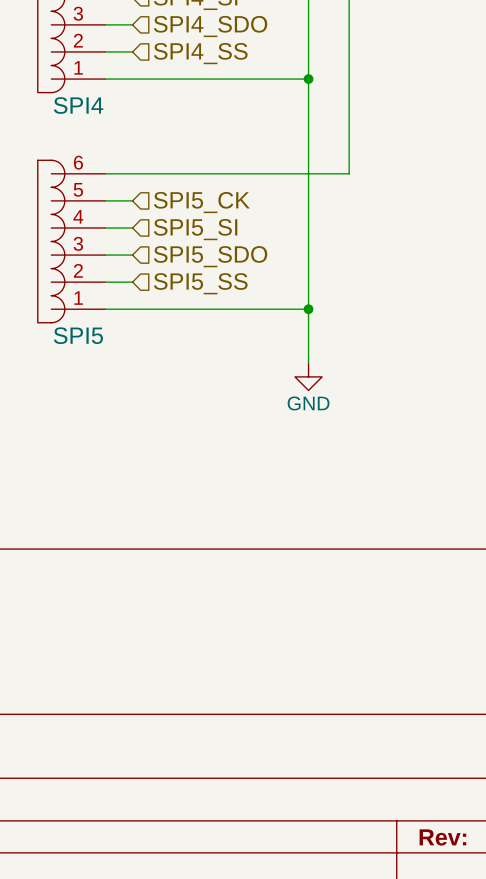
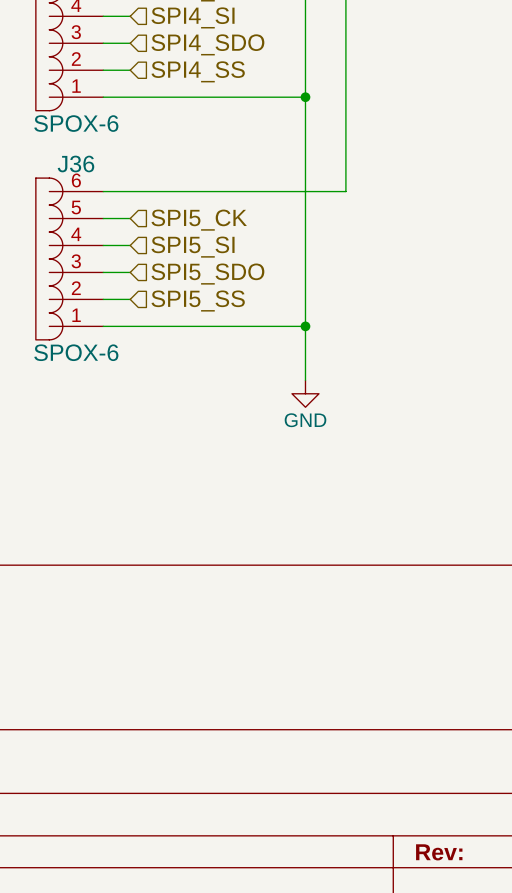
part value: SPI4 (78, 105) -> SPOX-6 (76, 123)
J36 name: none -> J36 (75, 163)
J36 value: SPI5 (78, 335) -> SPOX-6 (76, 352)

